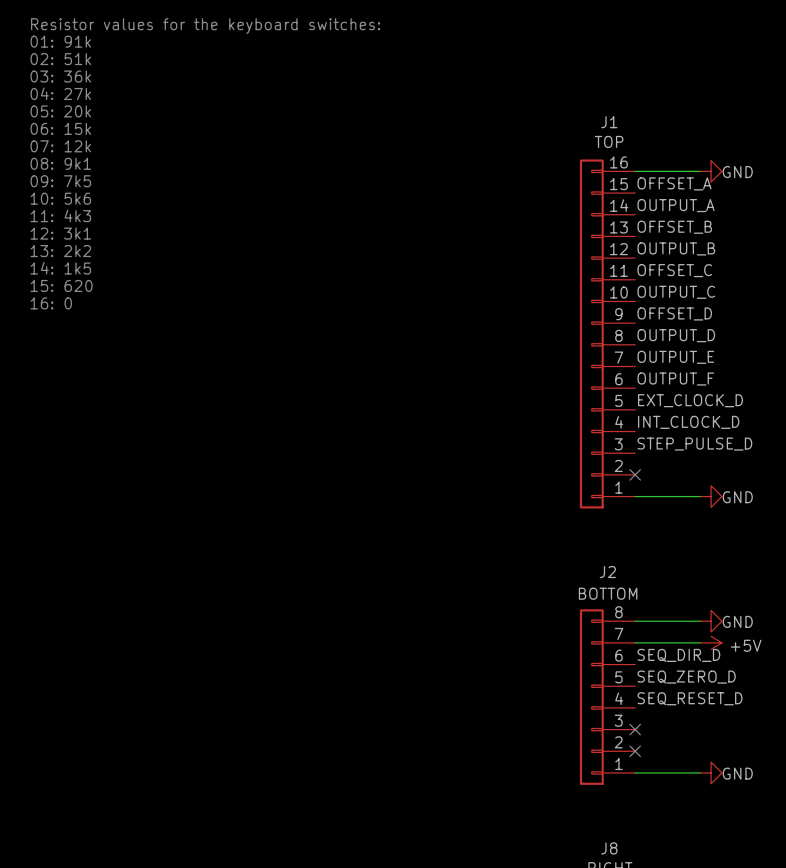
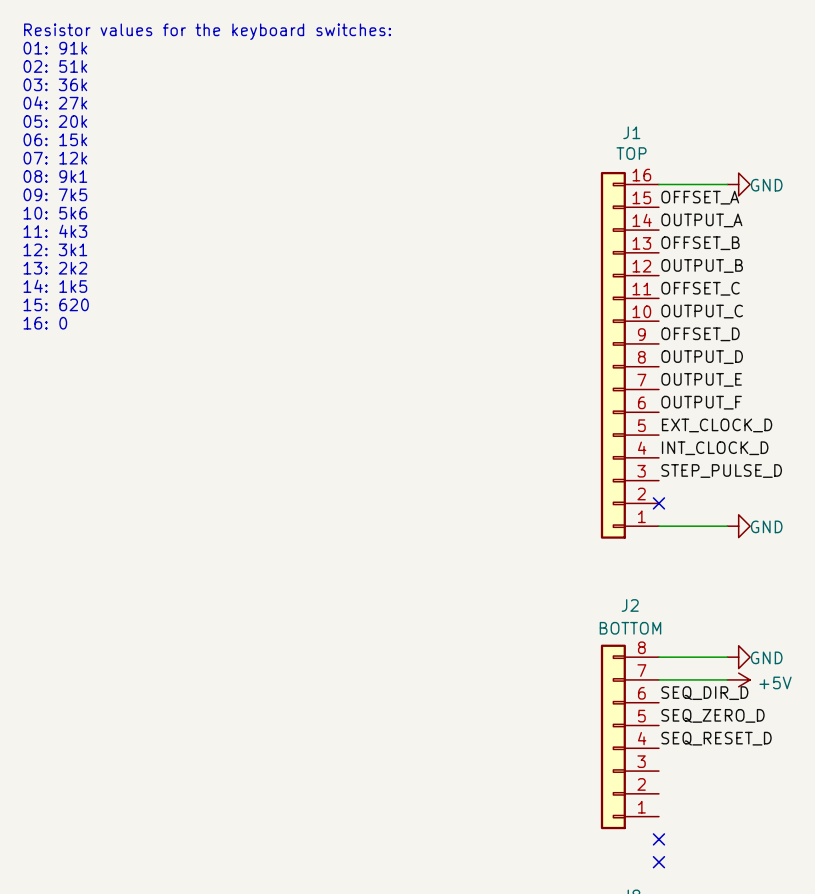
no-connect mark: (635, 729) -> none
no-connect mark: (635, 751) -> none
wire: (635, 772) (700, 772) -> none
power symbol: GND (711, 772) -> none
no-connect mark: none -> (658, 839)
no-connect mark: none -> (658, 862)

